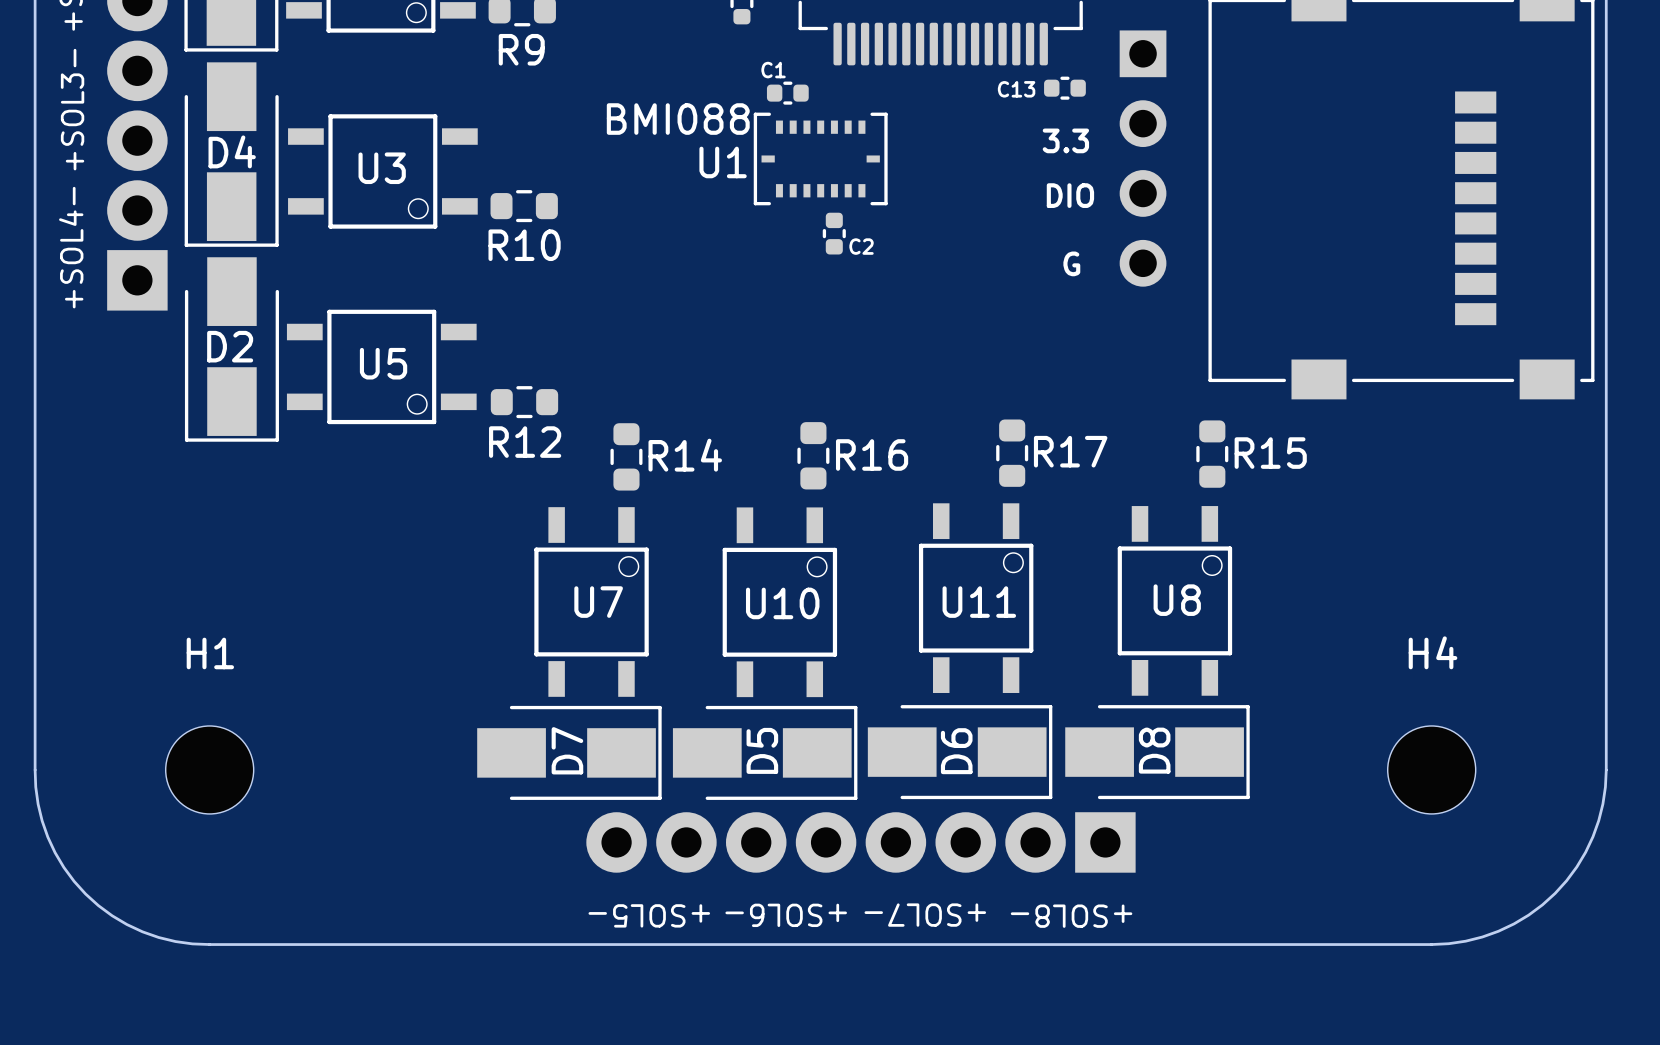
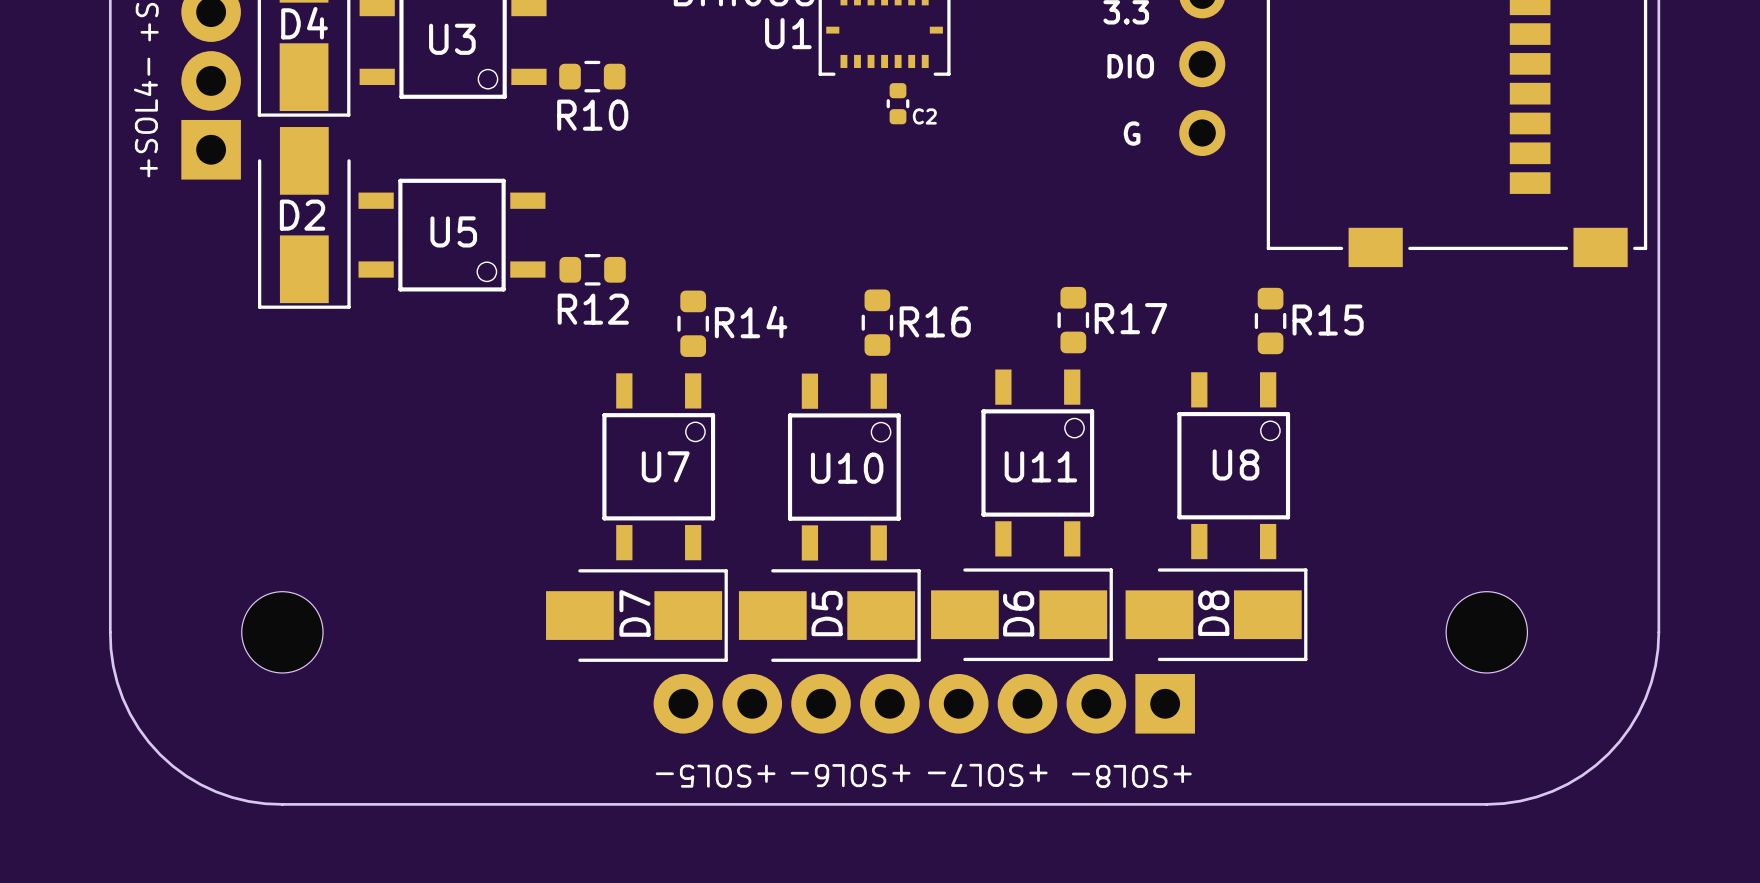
H1: (209, 769) -> none
part: none -> (282, 632)
H4: (1431, 769) -> none
part: none -> (1486, 632)

